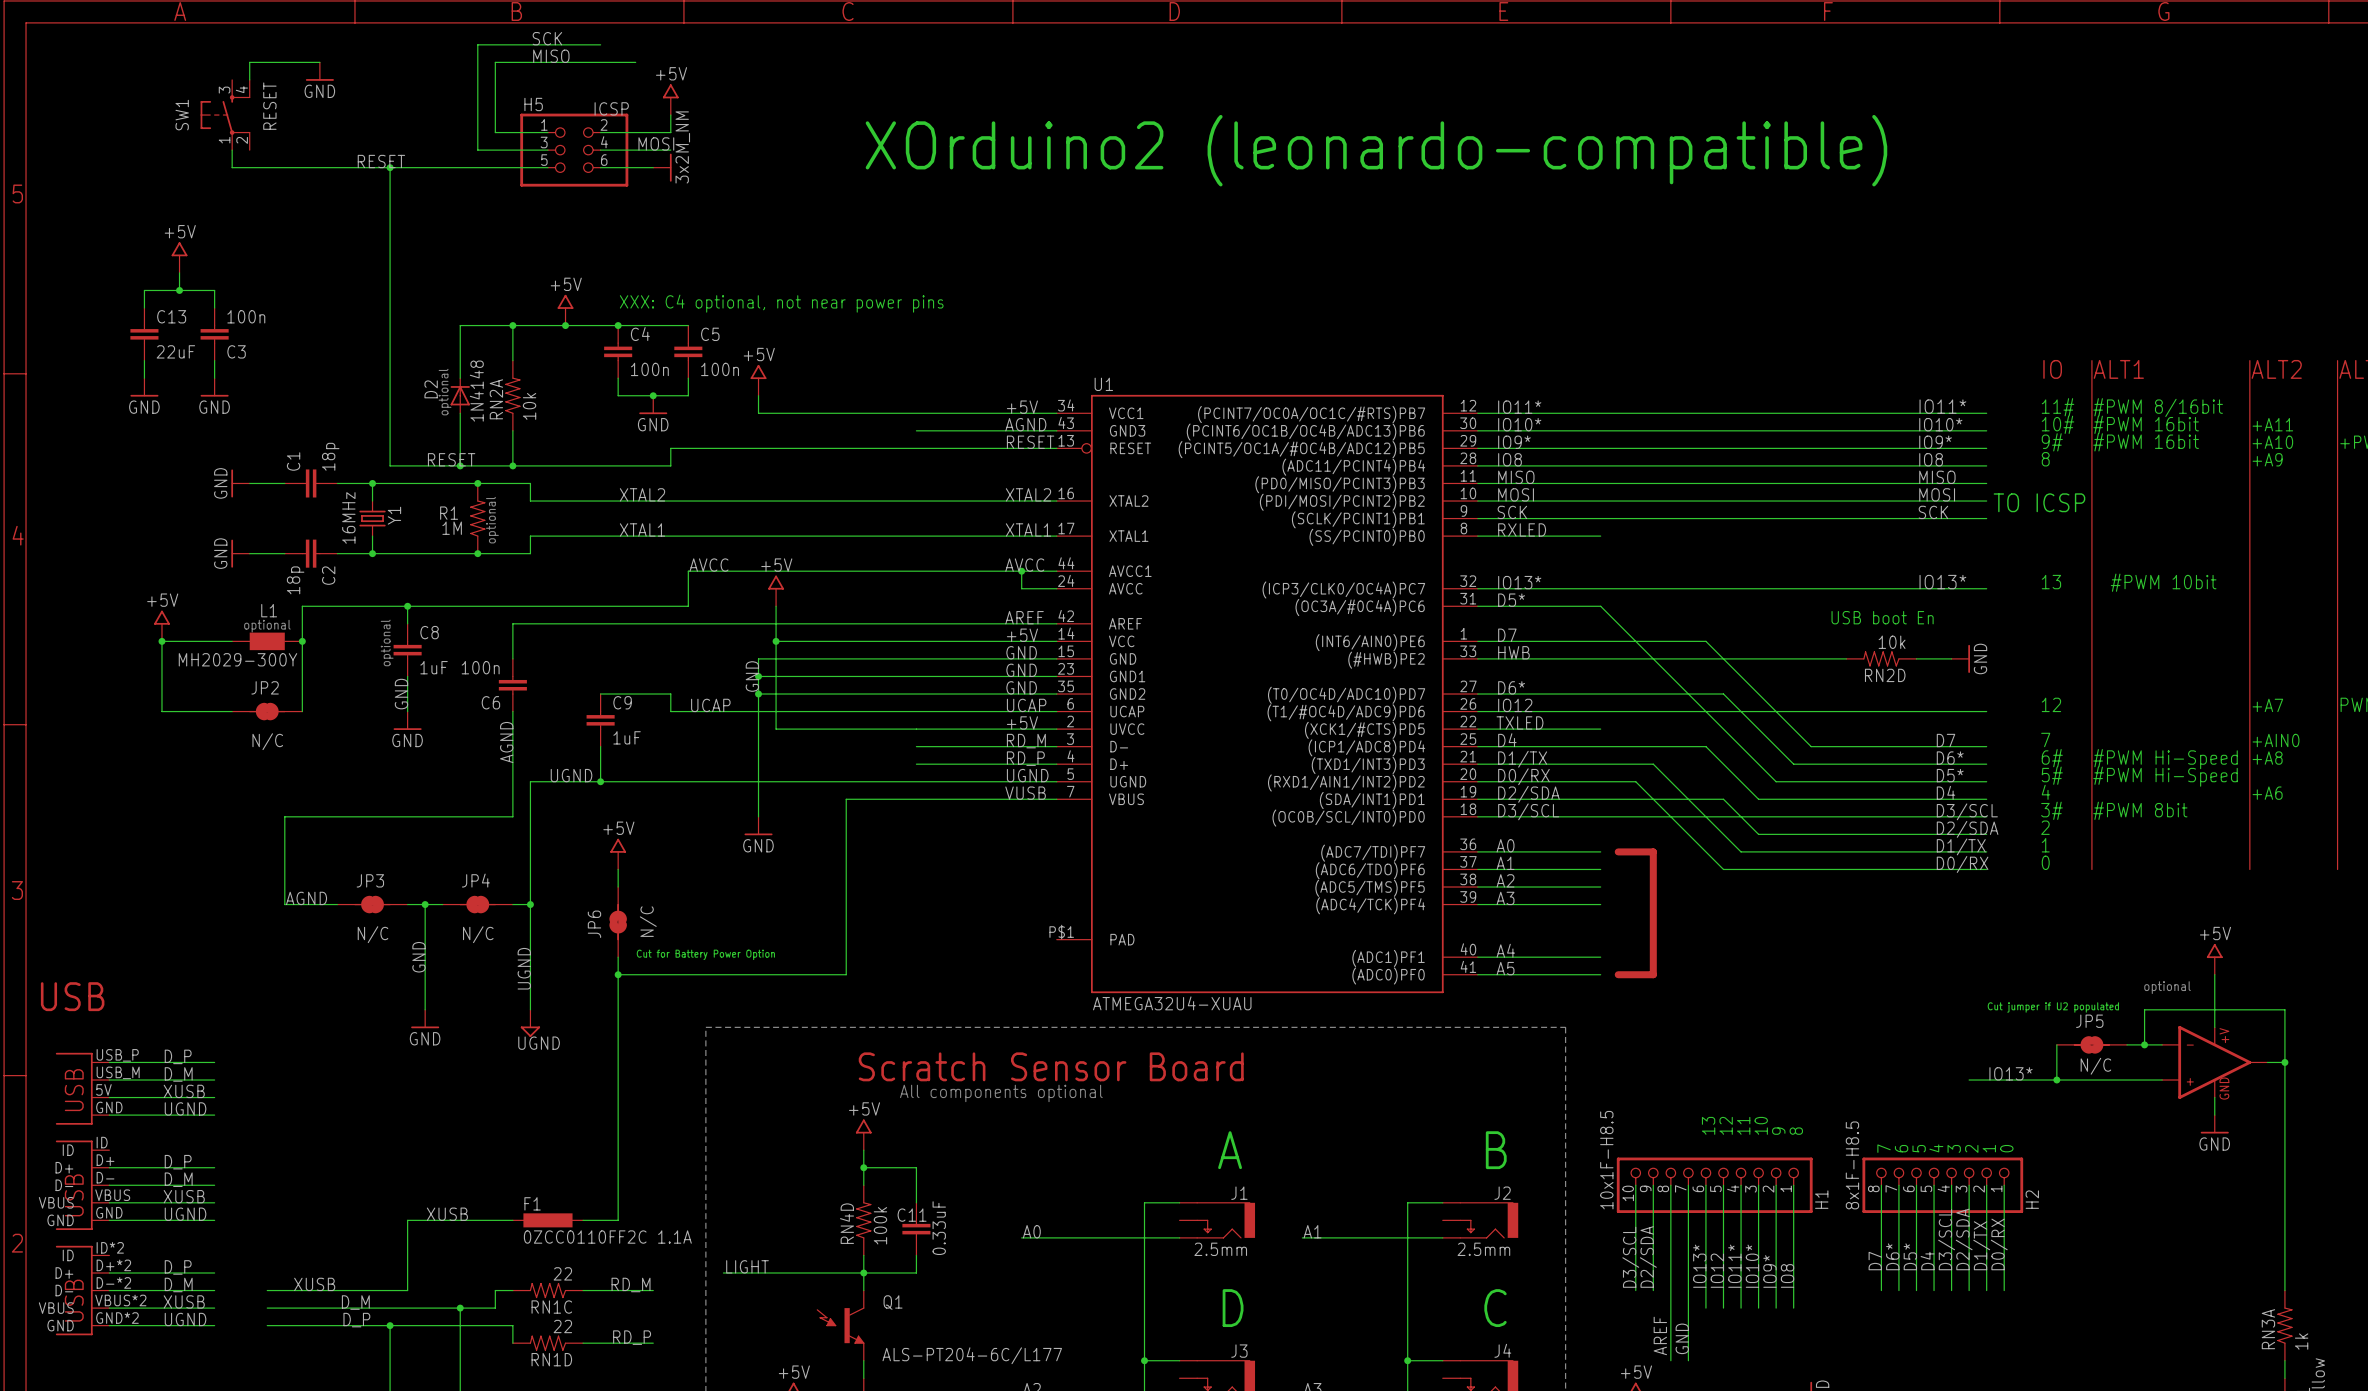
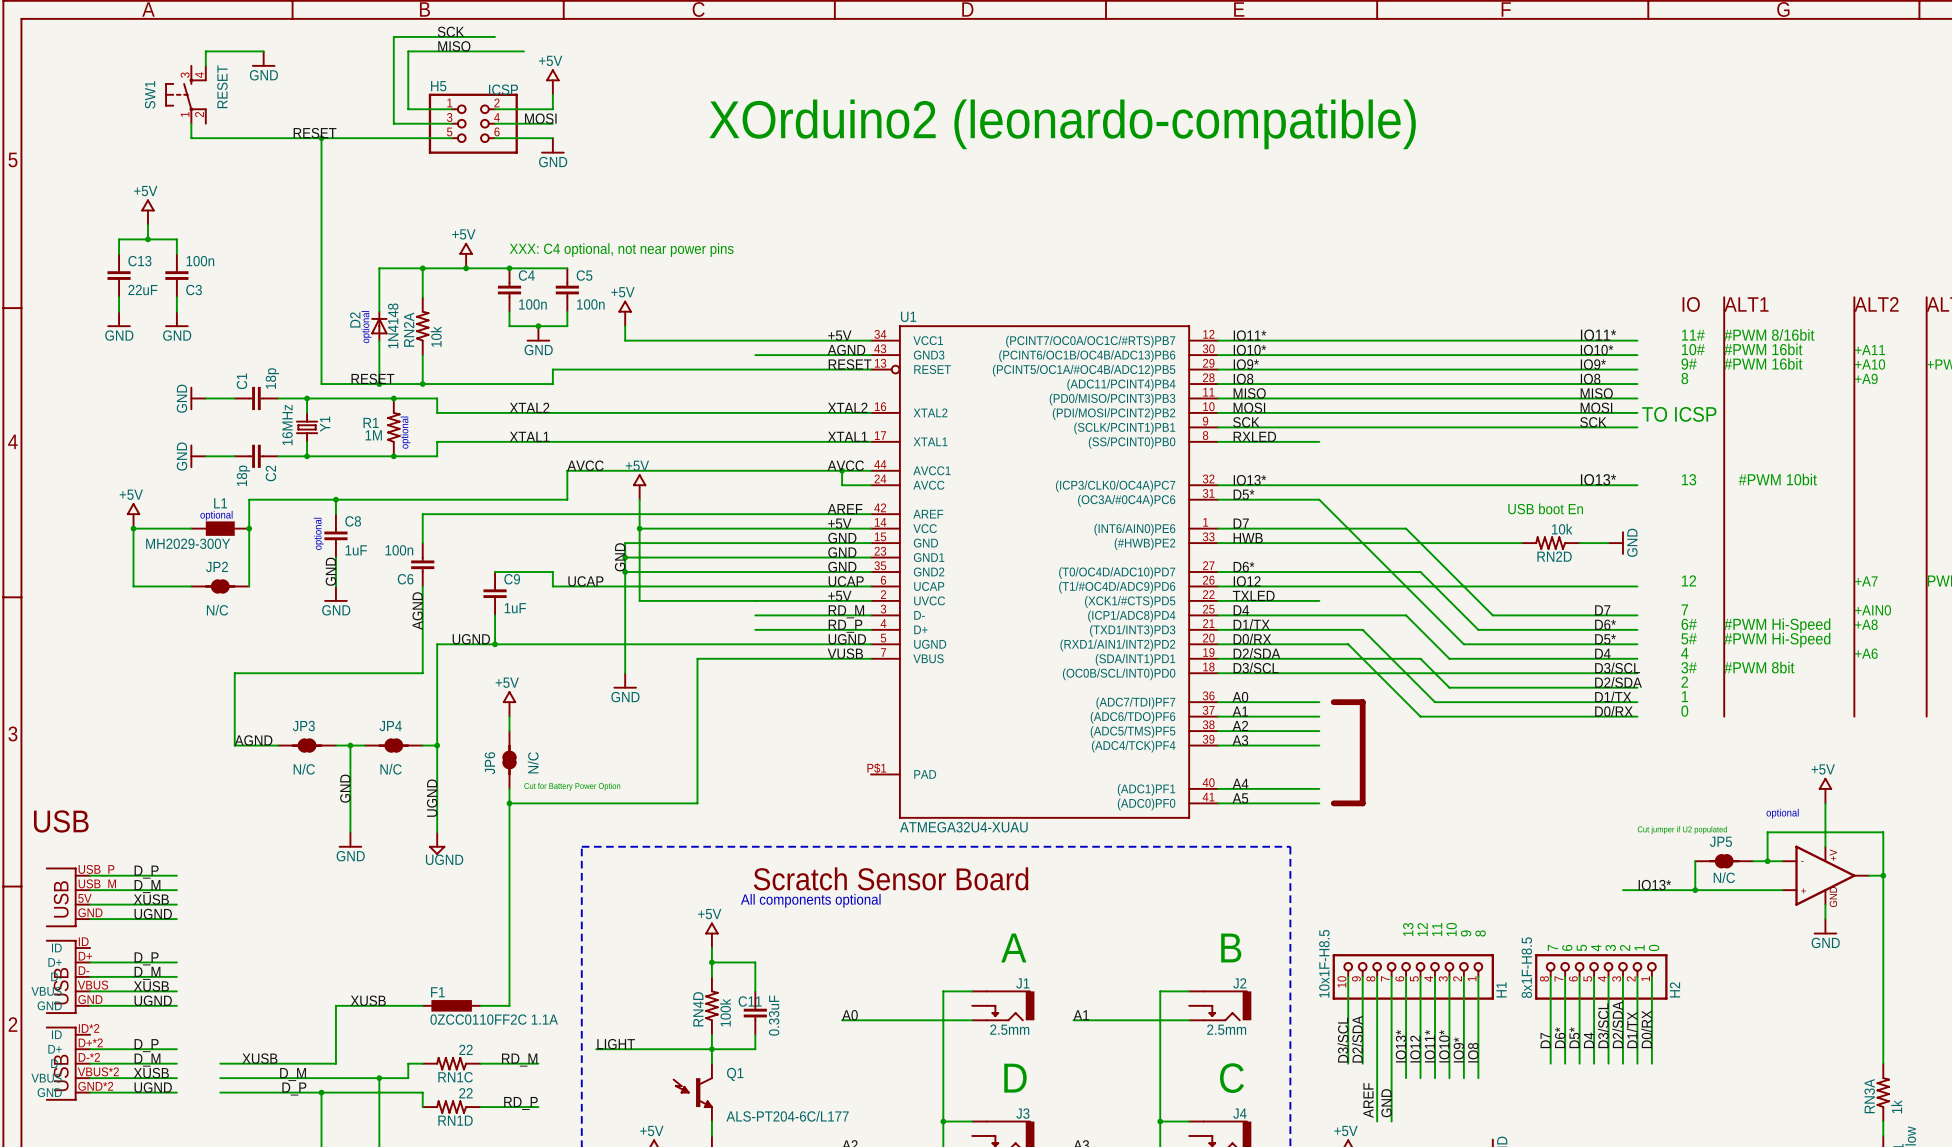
power symbol: 3x2M_NM (662, 167) -> none
power symbol: none -> GND (552, 145)

